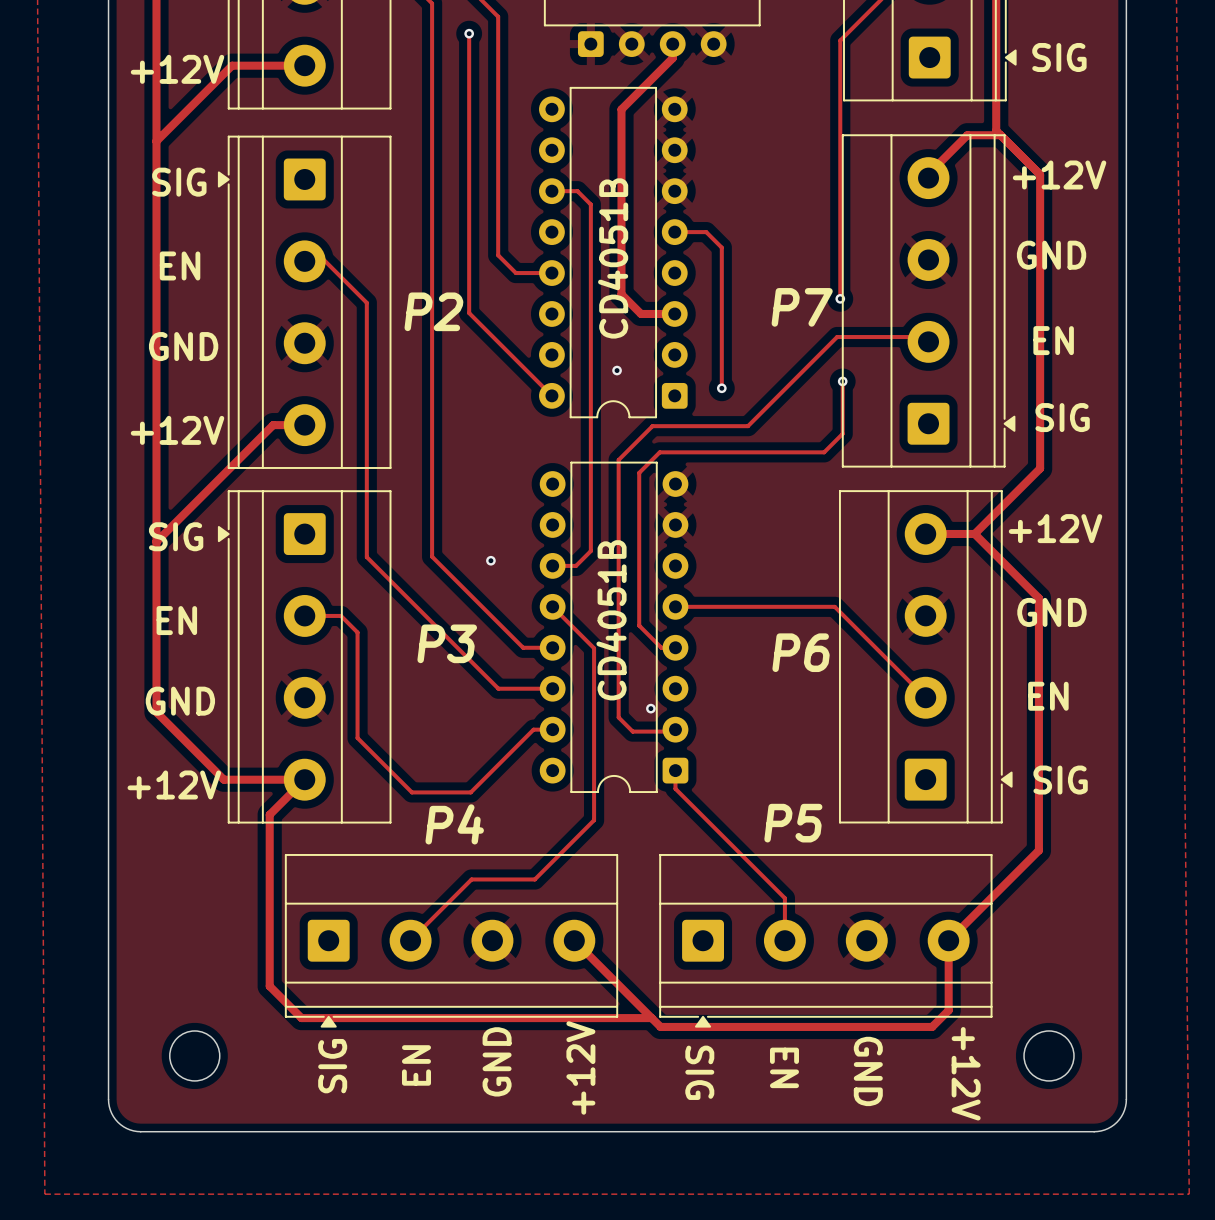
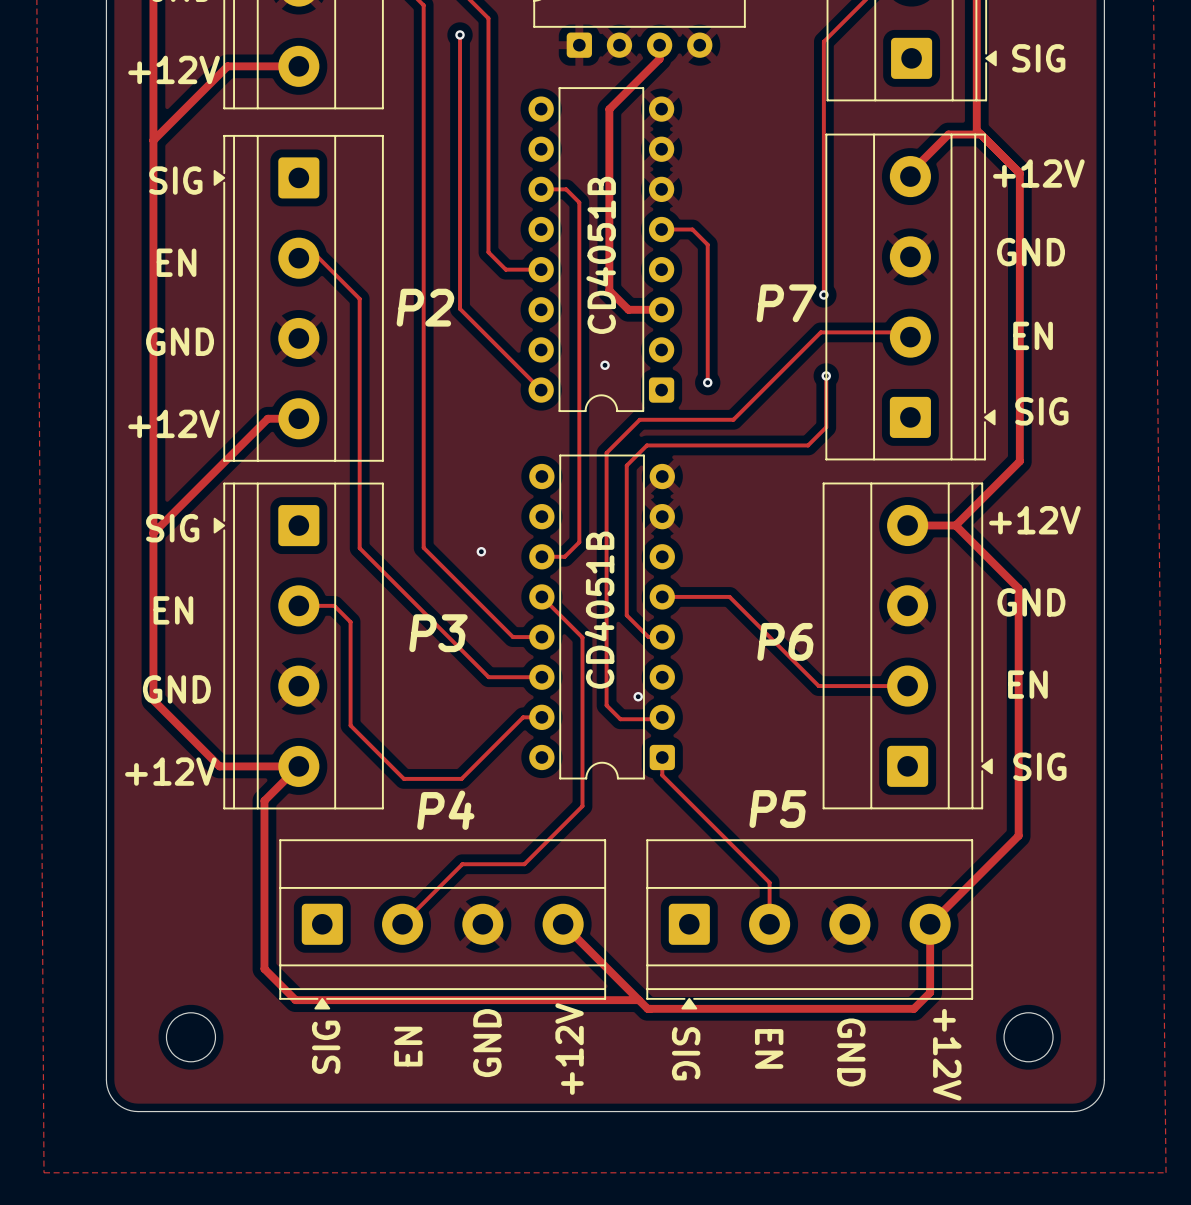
track: (744, 606) (834, 606) (925, 697) -> (729, 596) (818, 686) (907, 686)

